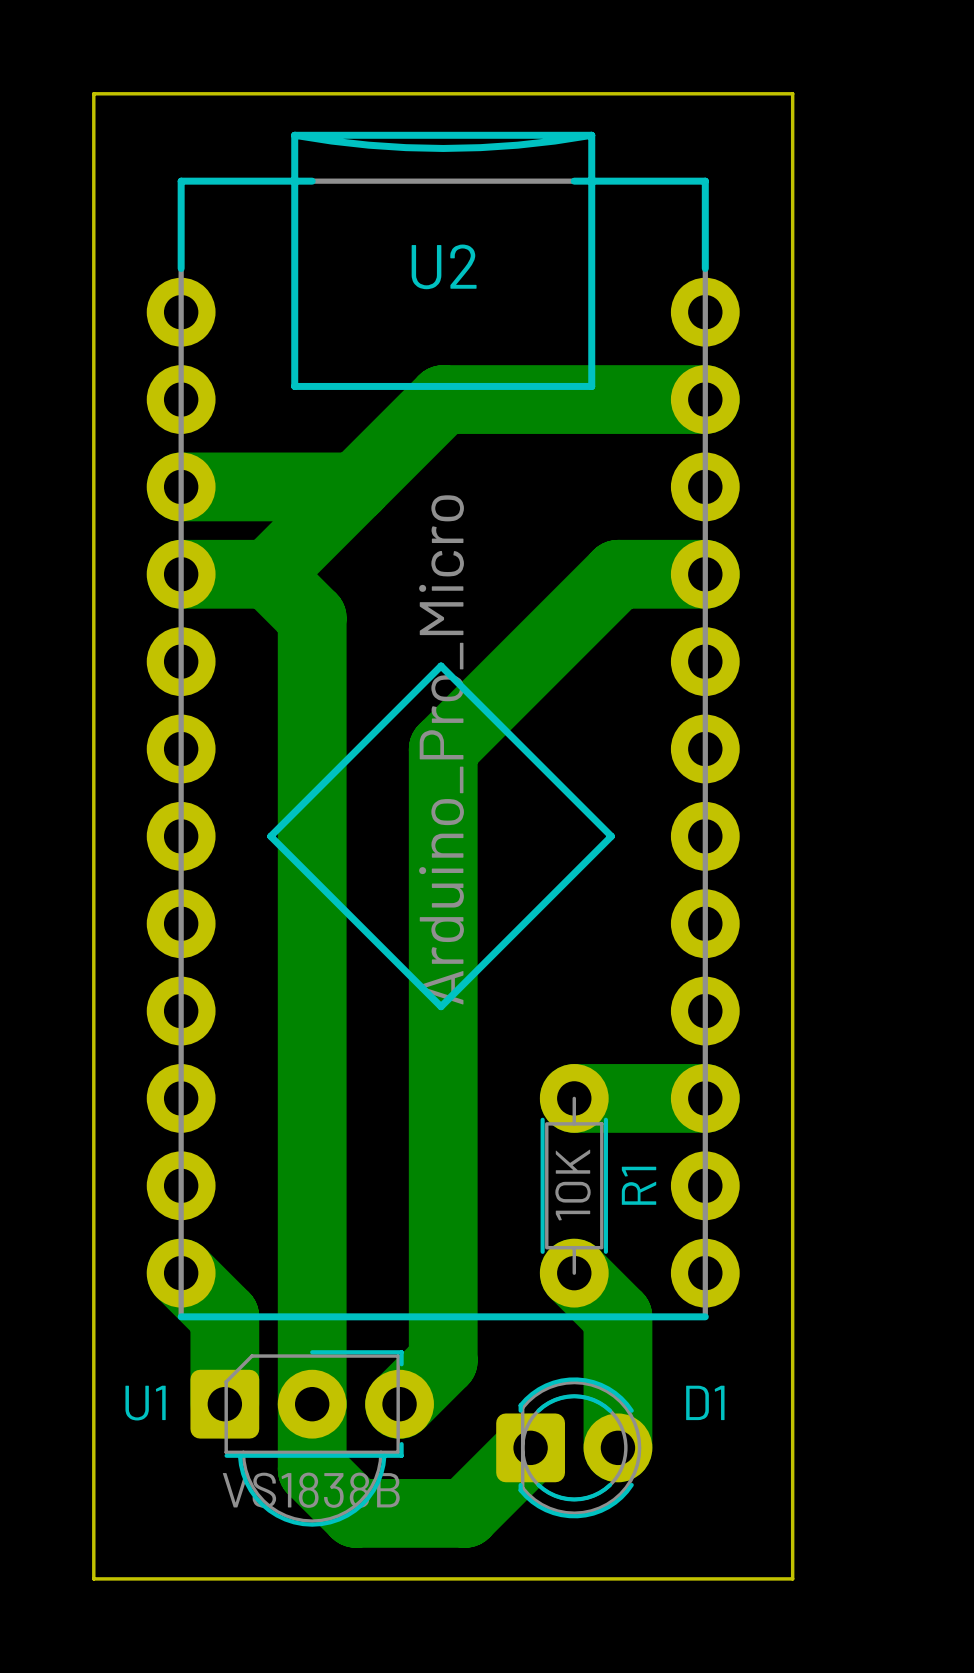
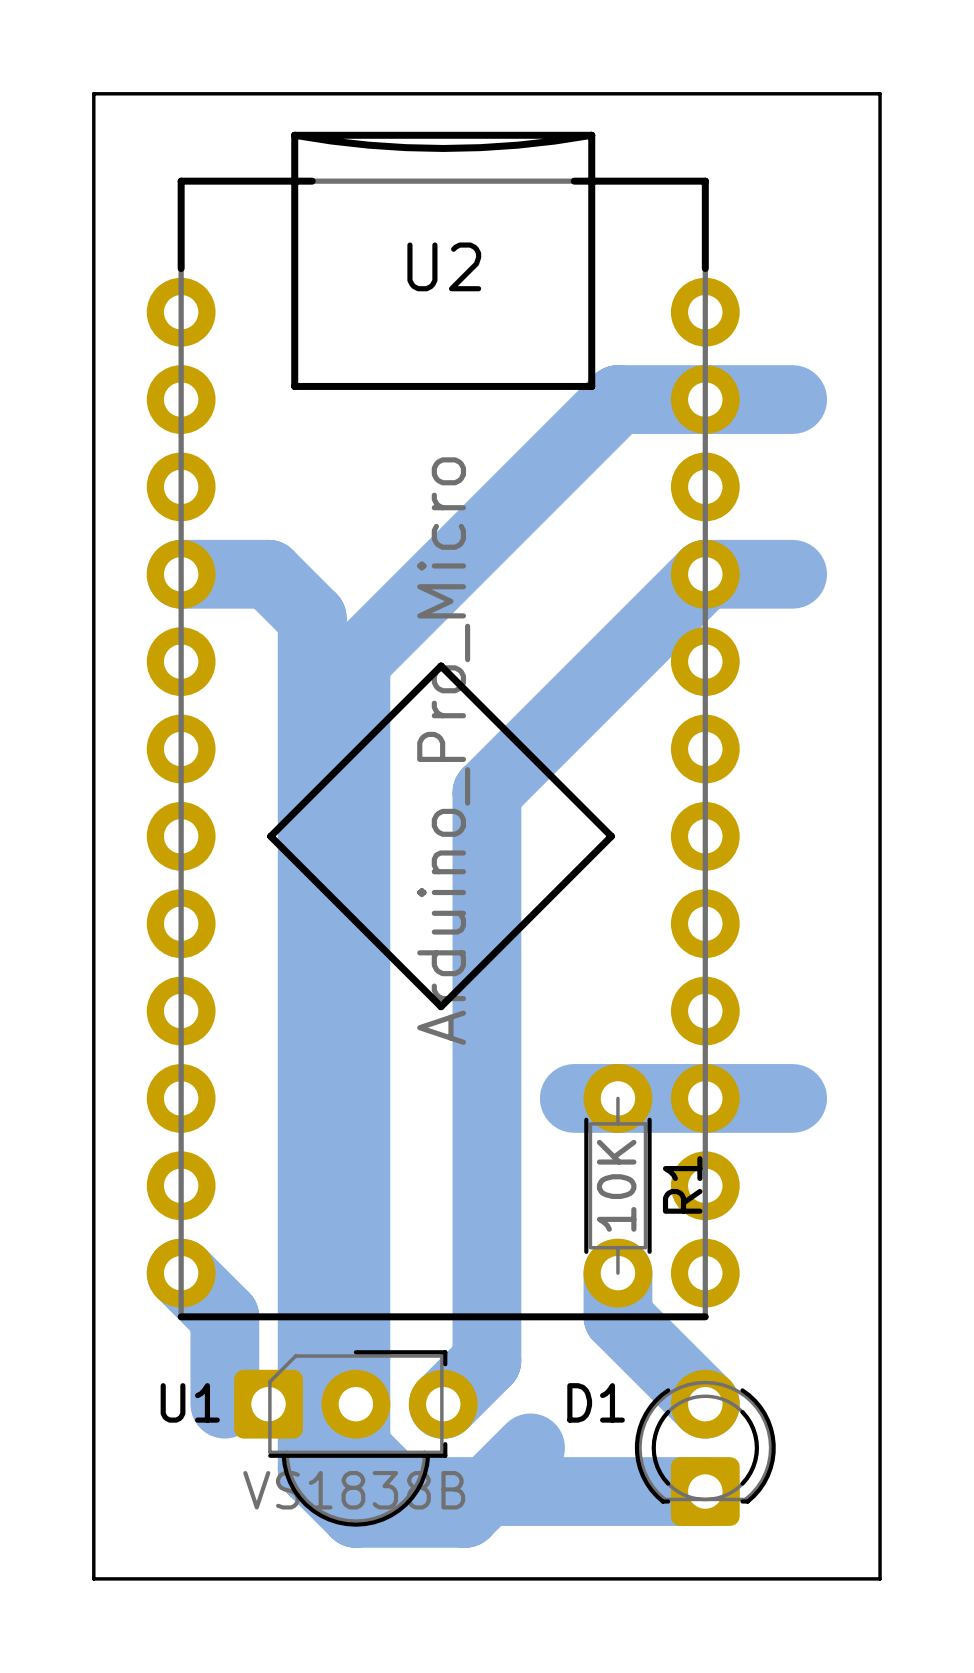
board edge: (792, 93) (792, 1578) -> (792, 93) (880, 93) (880, 1578) (792, 1578)
bottom track: (617, 399) (443, 399) (268, 574) -> (617, 399) (355, 661) (355, 1447) (399, 1491) (705, 1491)
bottom track: none -> (705, 399) (792, 399)
bottom track: (181, 486) (355, 486) -> none
bottom track: (705, 574) (617, 574) (443, 748) (443, 1360) (399, 1404) -> none
bottom track: none -> (792, 574) (705, 574) (486, 792) (486, 1360) (443, 1404)
bottom track: none -> (705, 1098) (792, 1098)
R1 position: (574, 1185) -> (617, 1185)
bottom track: (574, 1273) (617, 1316) (617, 1447) -> none
bottom track: none -> (617, 1273) (617, 1316) (705, 1404)
D1 name position: D1 (705, 1402) -> D1 (596, 1402)
U1 position: (312, 1438) -> (355, 1438)
D1 rotation: 0° (574, 1447) -> 90° counterclockwise (705, 1447)
D1 position: (574, 1447) -> (705, 1447)

